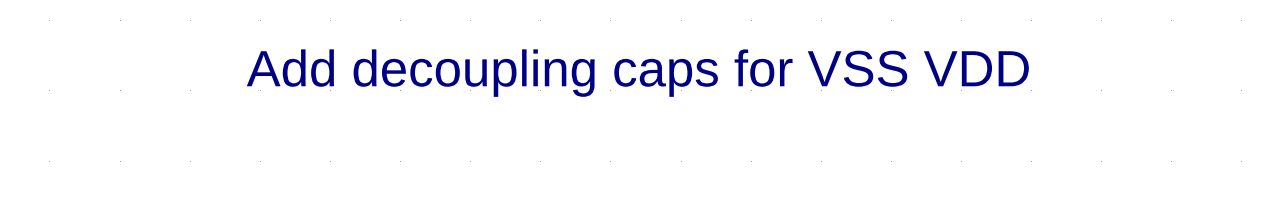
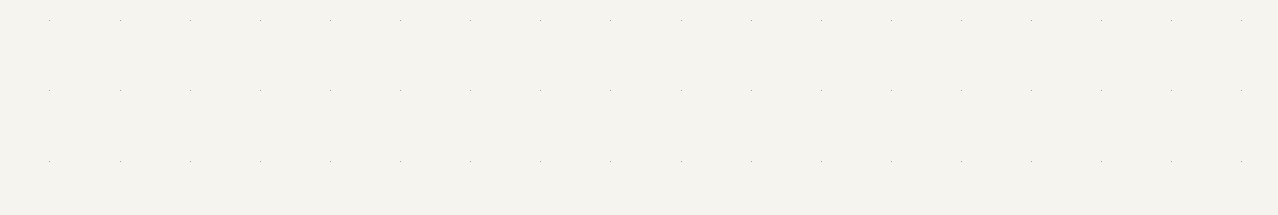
text: Add decoupling caps for VSS VDD (637, 73) -> none

